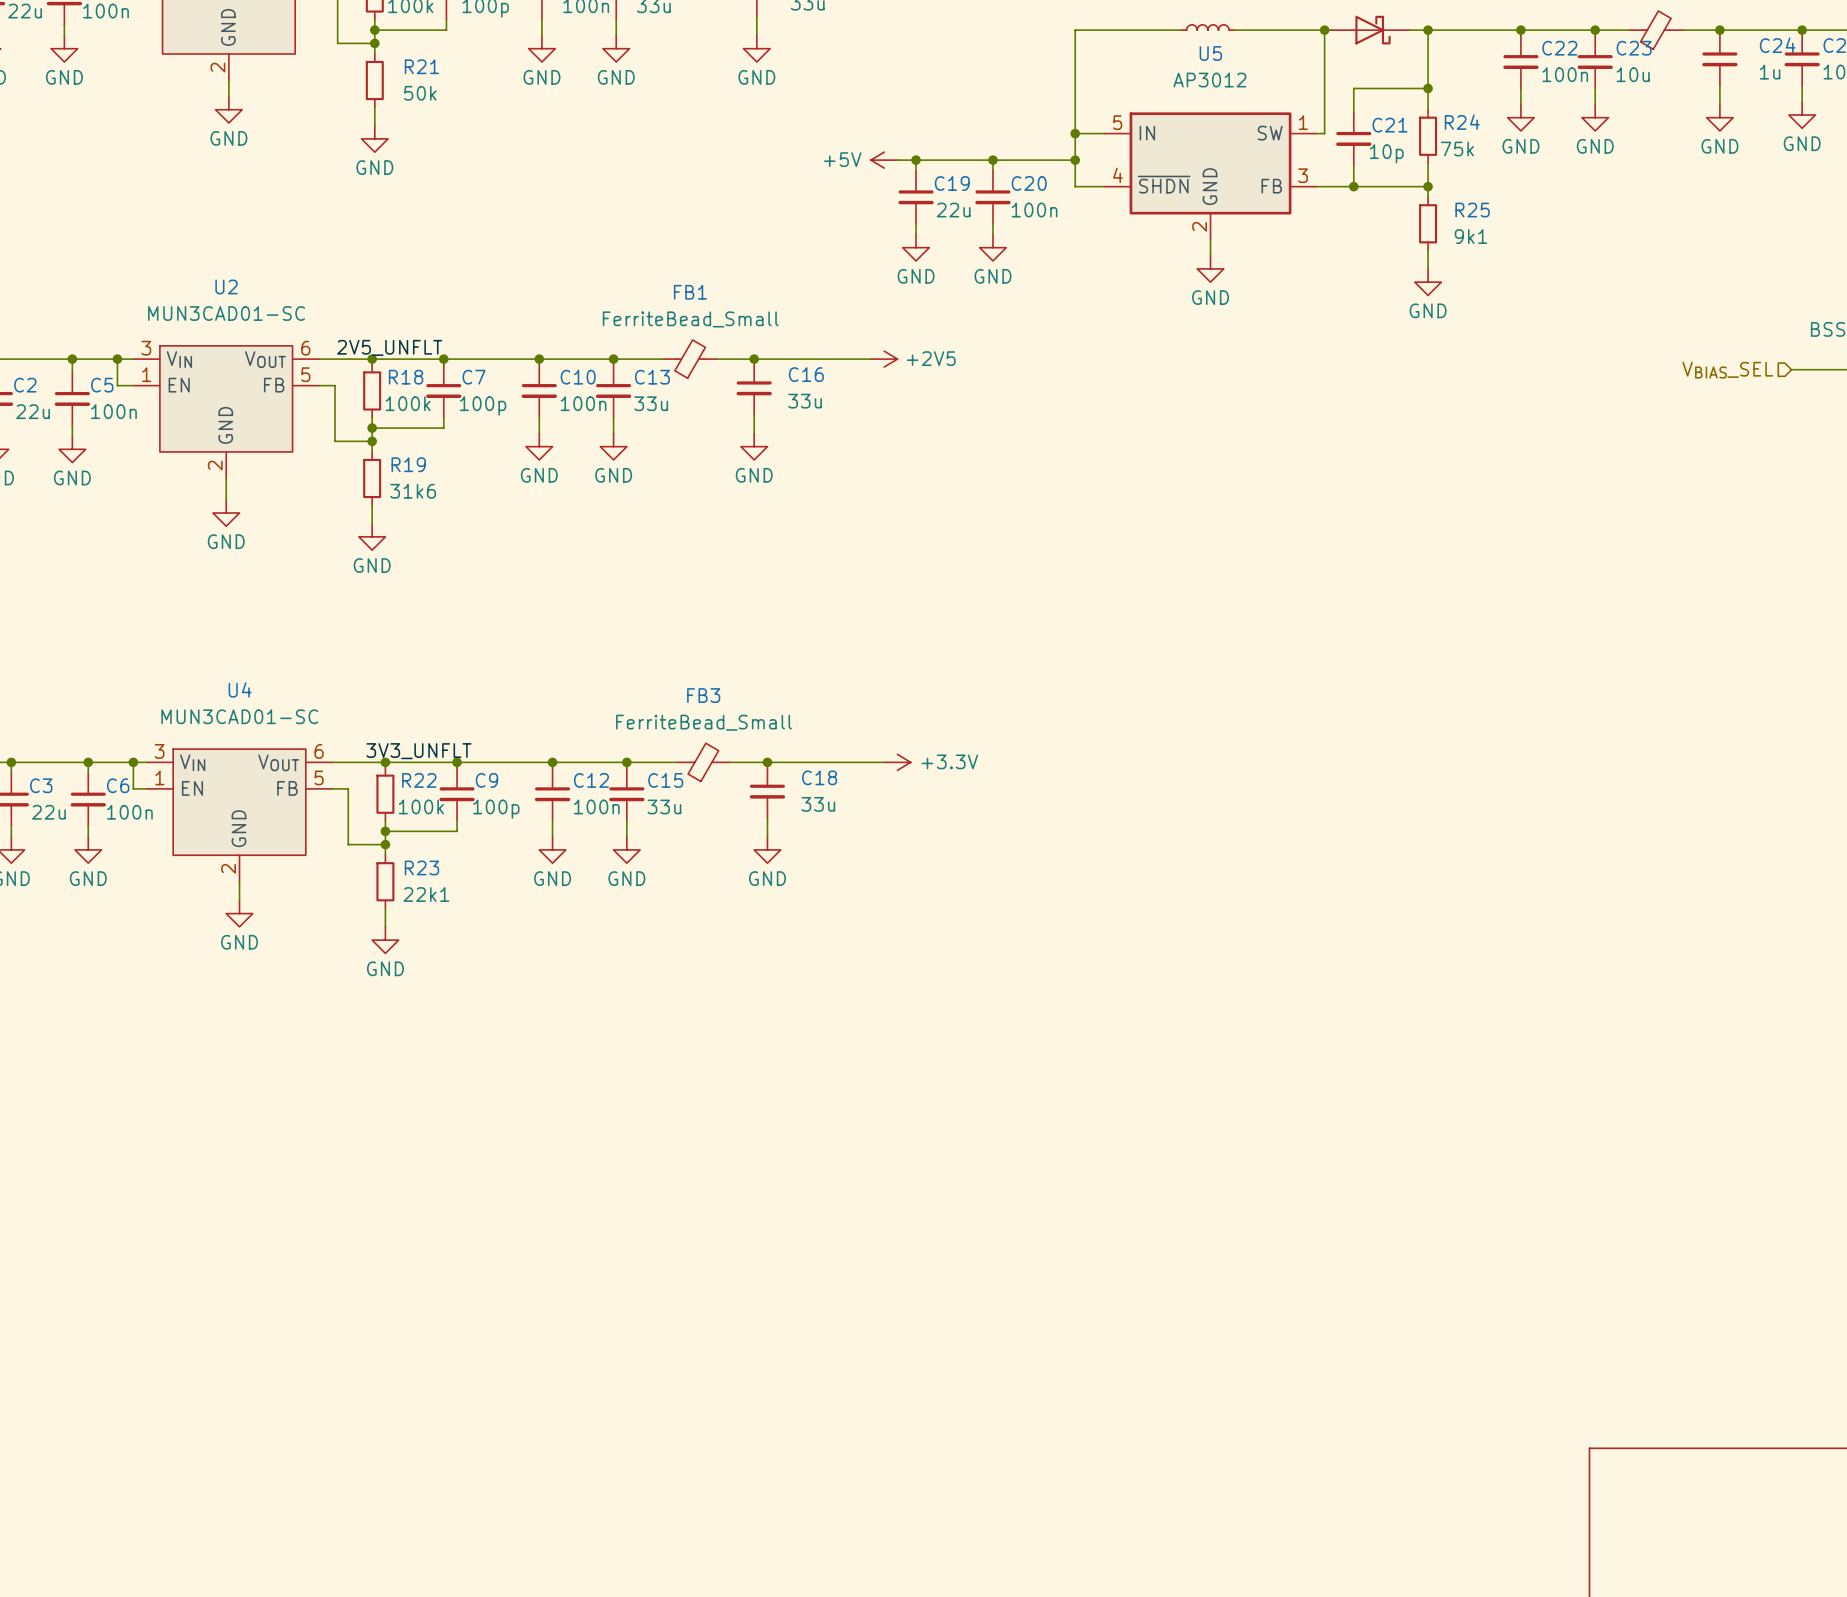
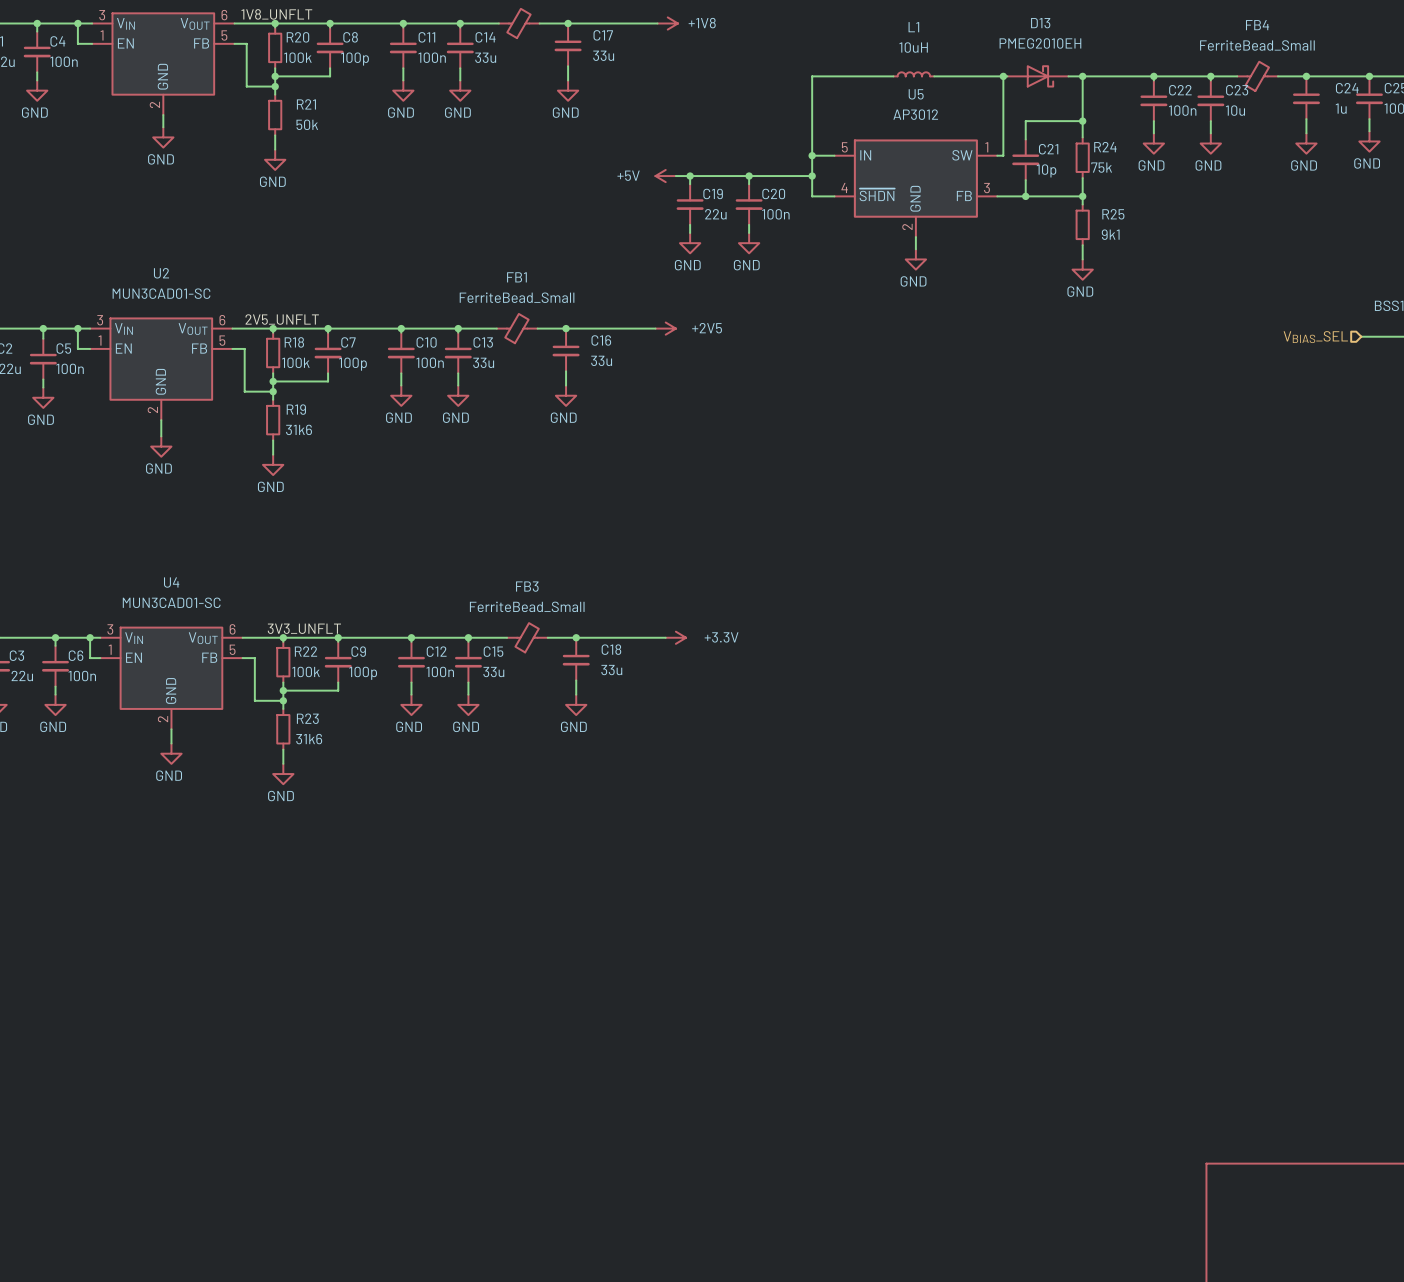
R23 value: 22k1 (426, 894) -> 31k6 (309, 739)

